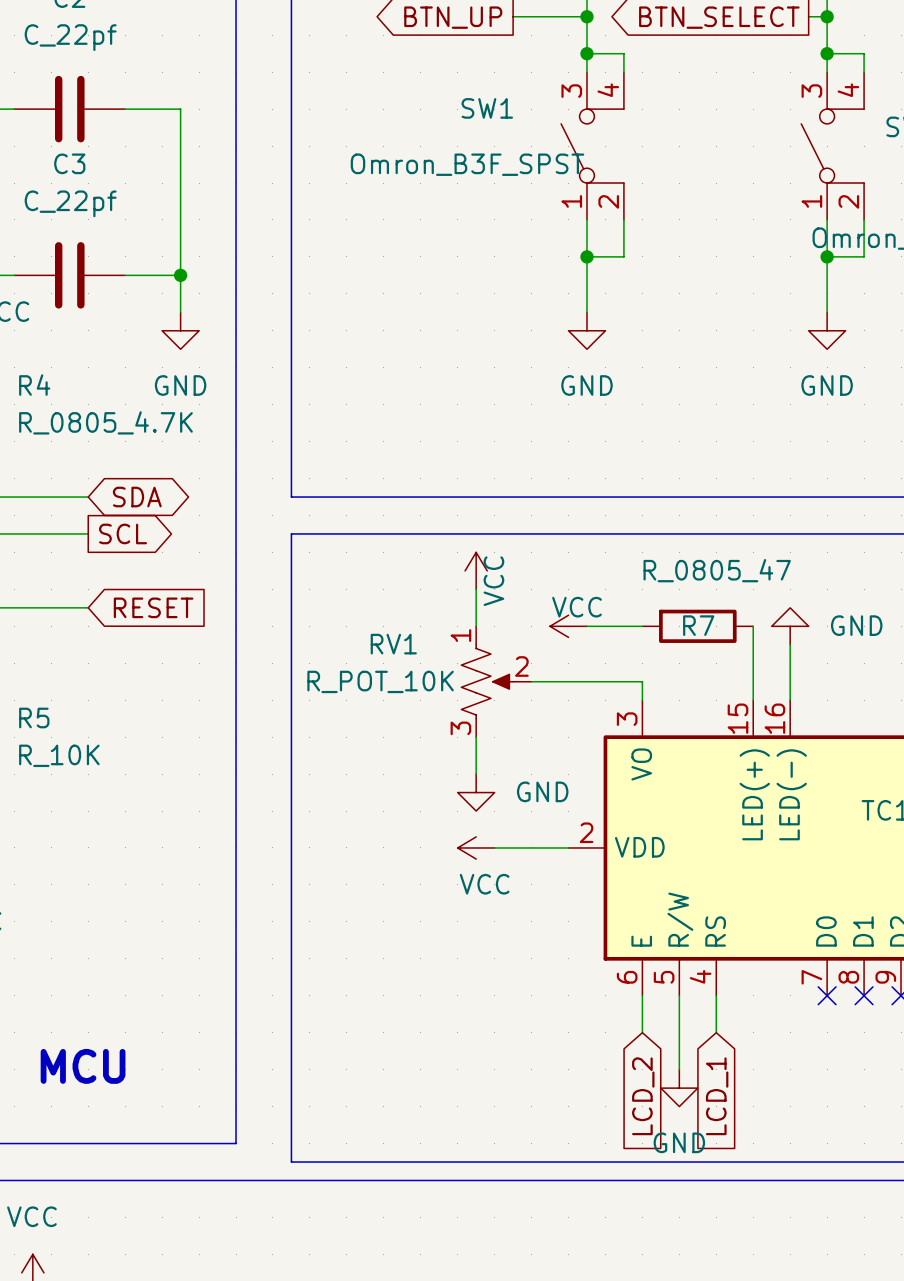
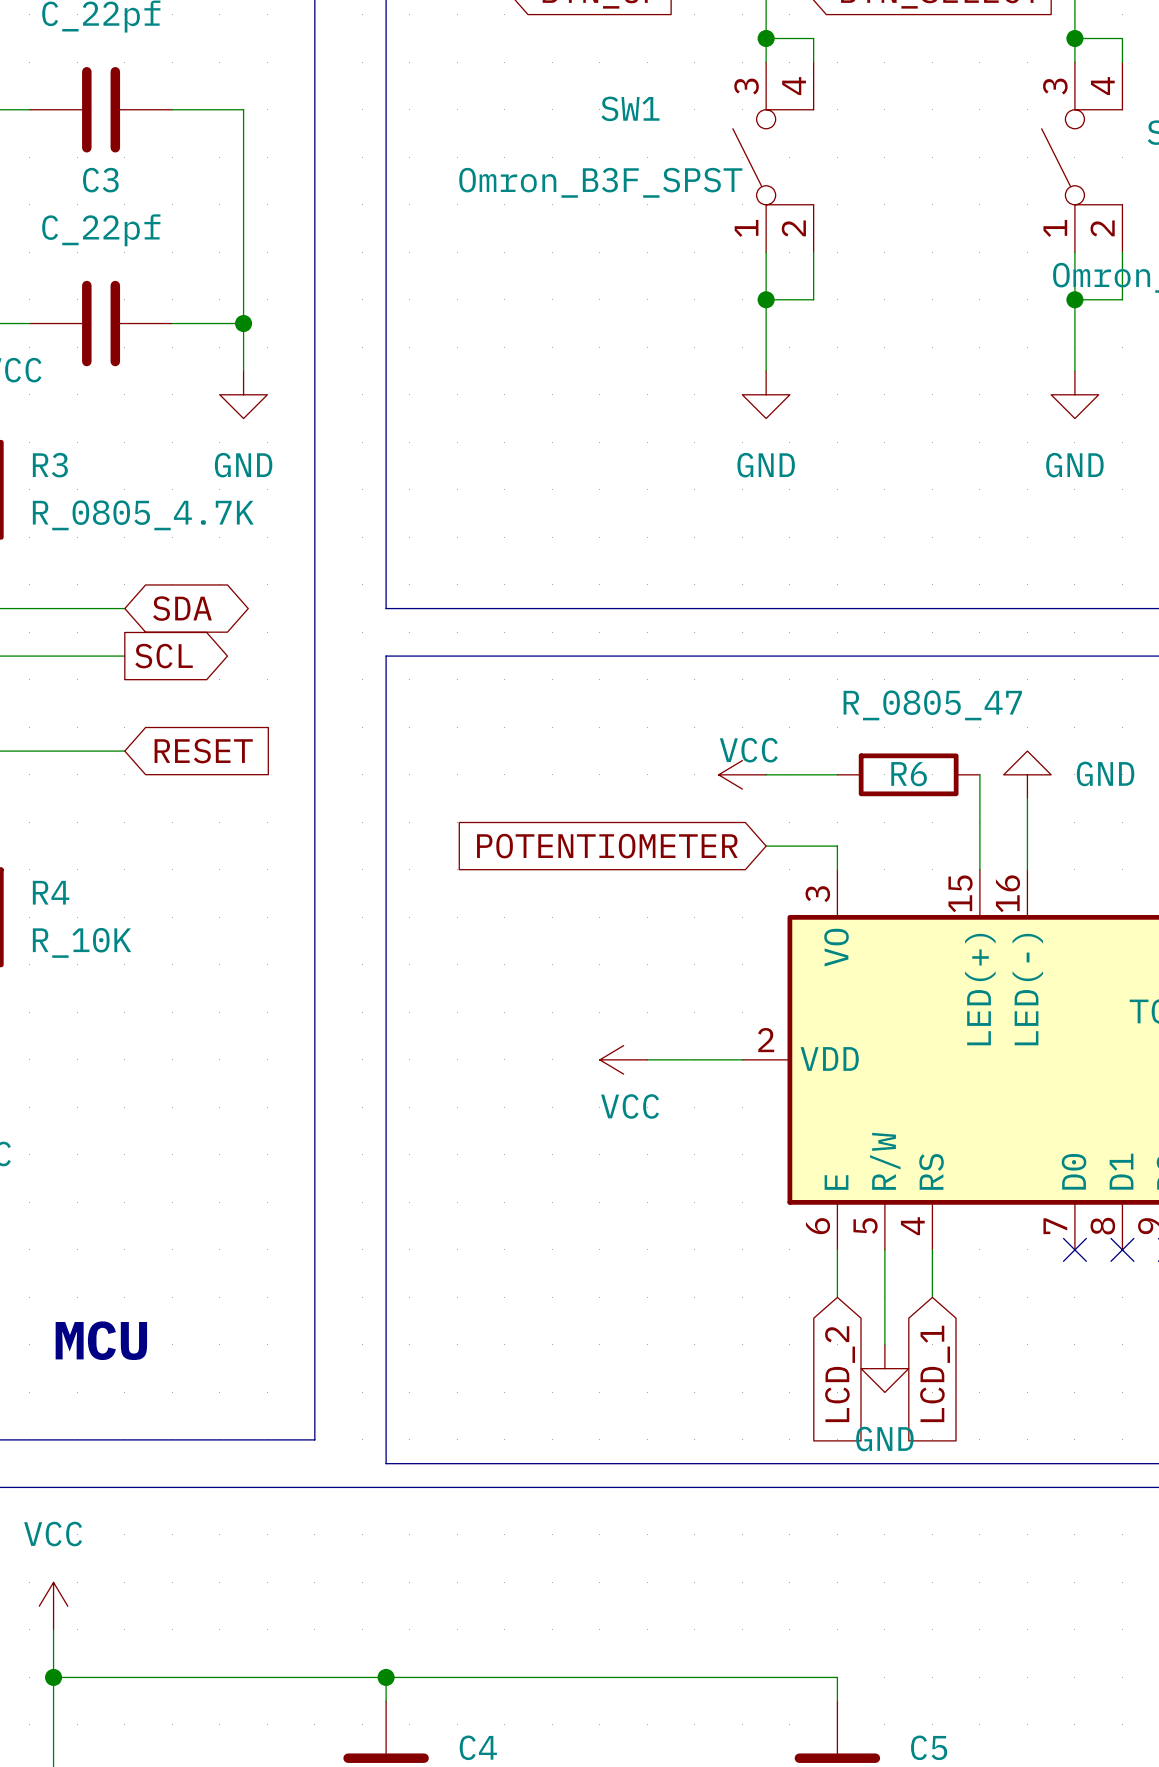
R4 name: R4 (34, 385) -> R3 (50, 465)
power symbol: VCC (476, 570) -> none
wire: (476, 589) (476, 626) -> none
R7 name: R7 (698, 625) -> R6 (909, 774)
global label: none -> POTENTIOMETER (607, 846)
RV1: R_POT_10K (496, 681) -> none
wire: (531, 681) (586, 681) -> none
R5 name: R5 (34, 717) -> R4 (51, 892)
wire: (476, 737) (476, 774) -> none
power symbol: GND (476, 792) -> none

